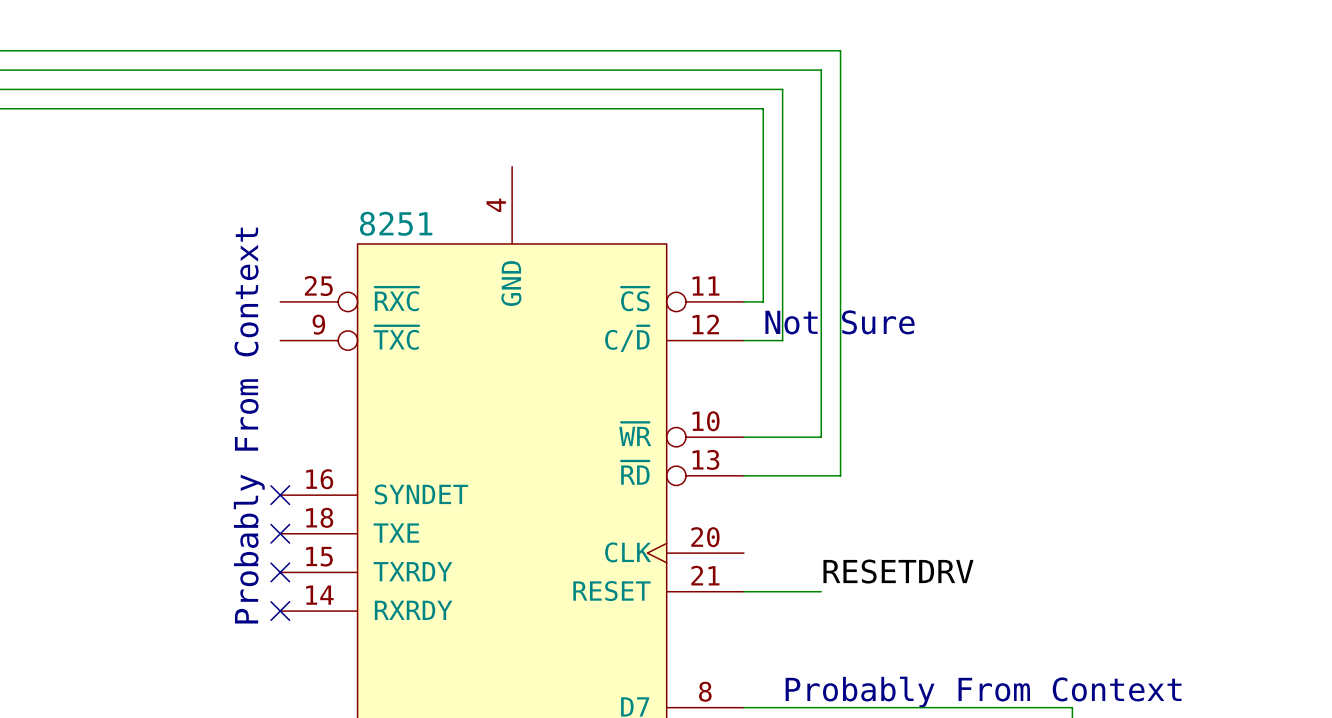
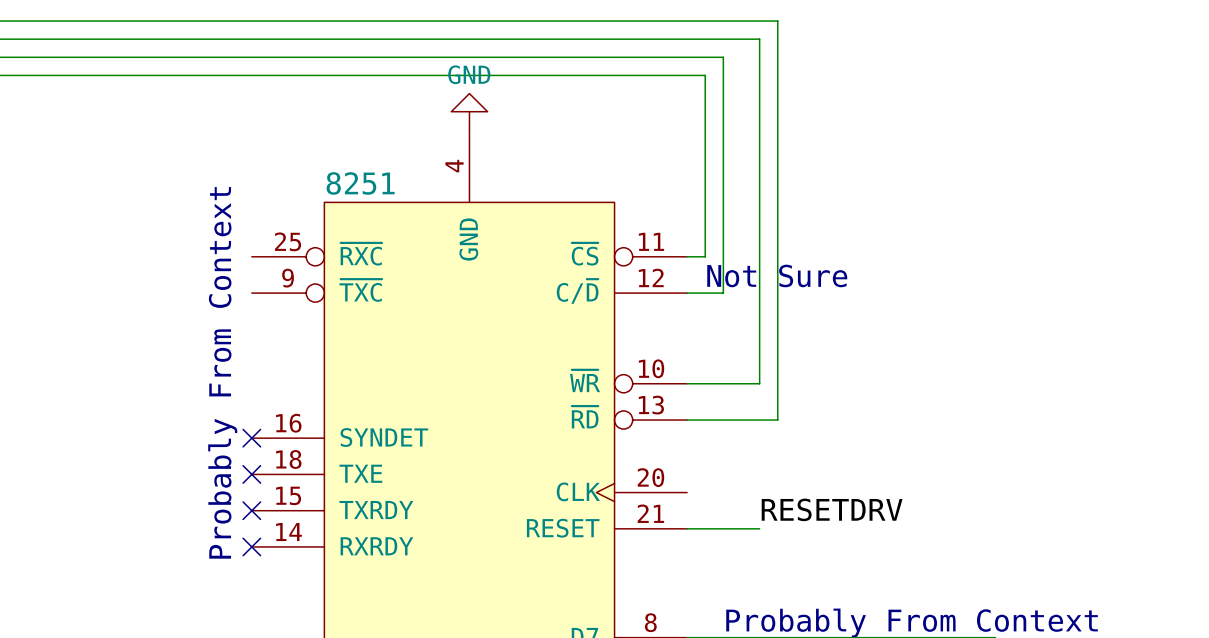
power symbol: none -> GND (469, 111)

